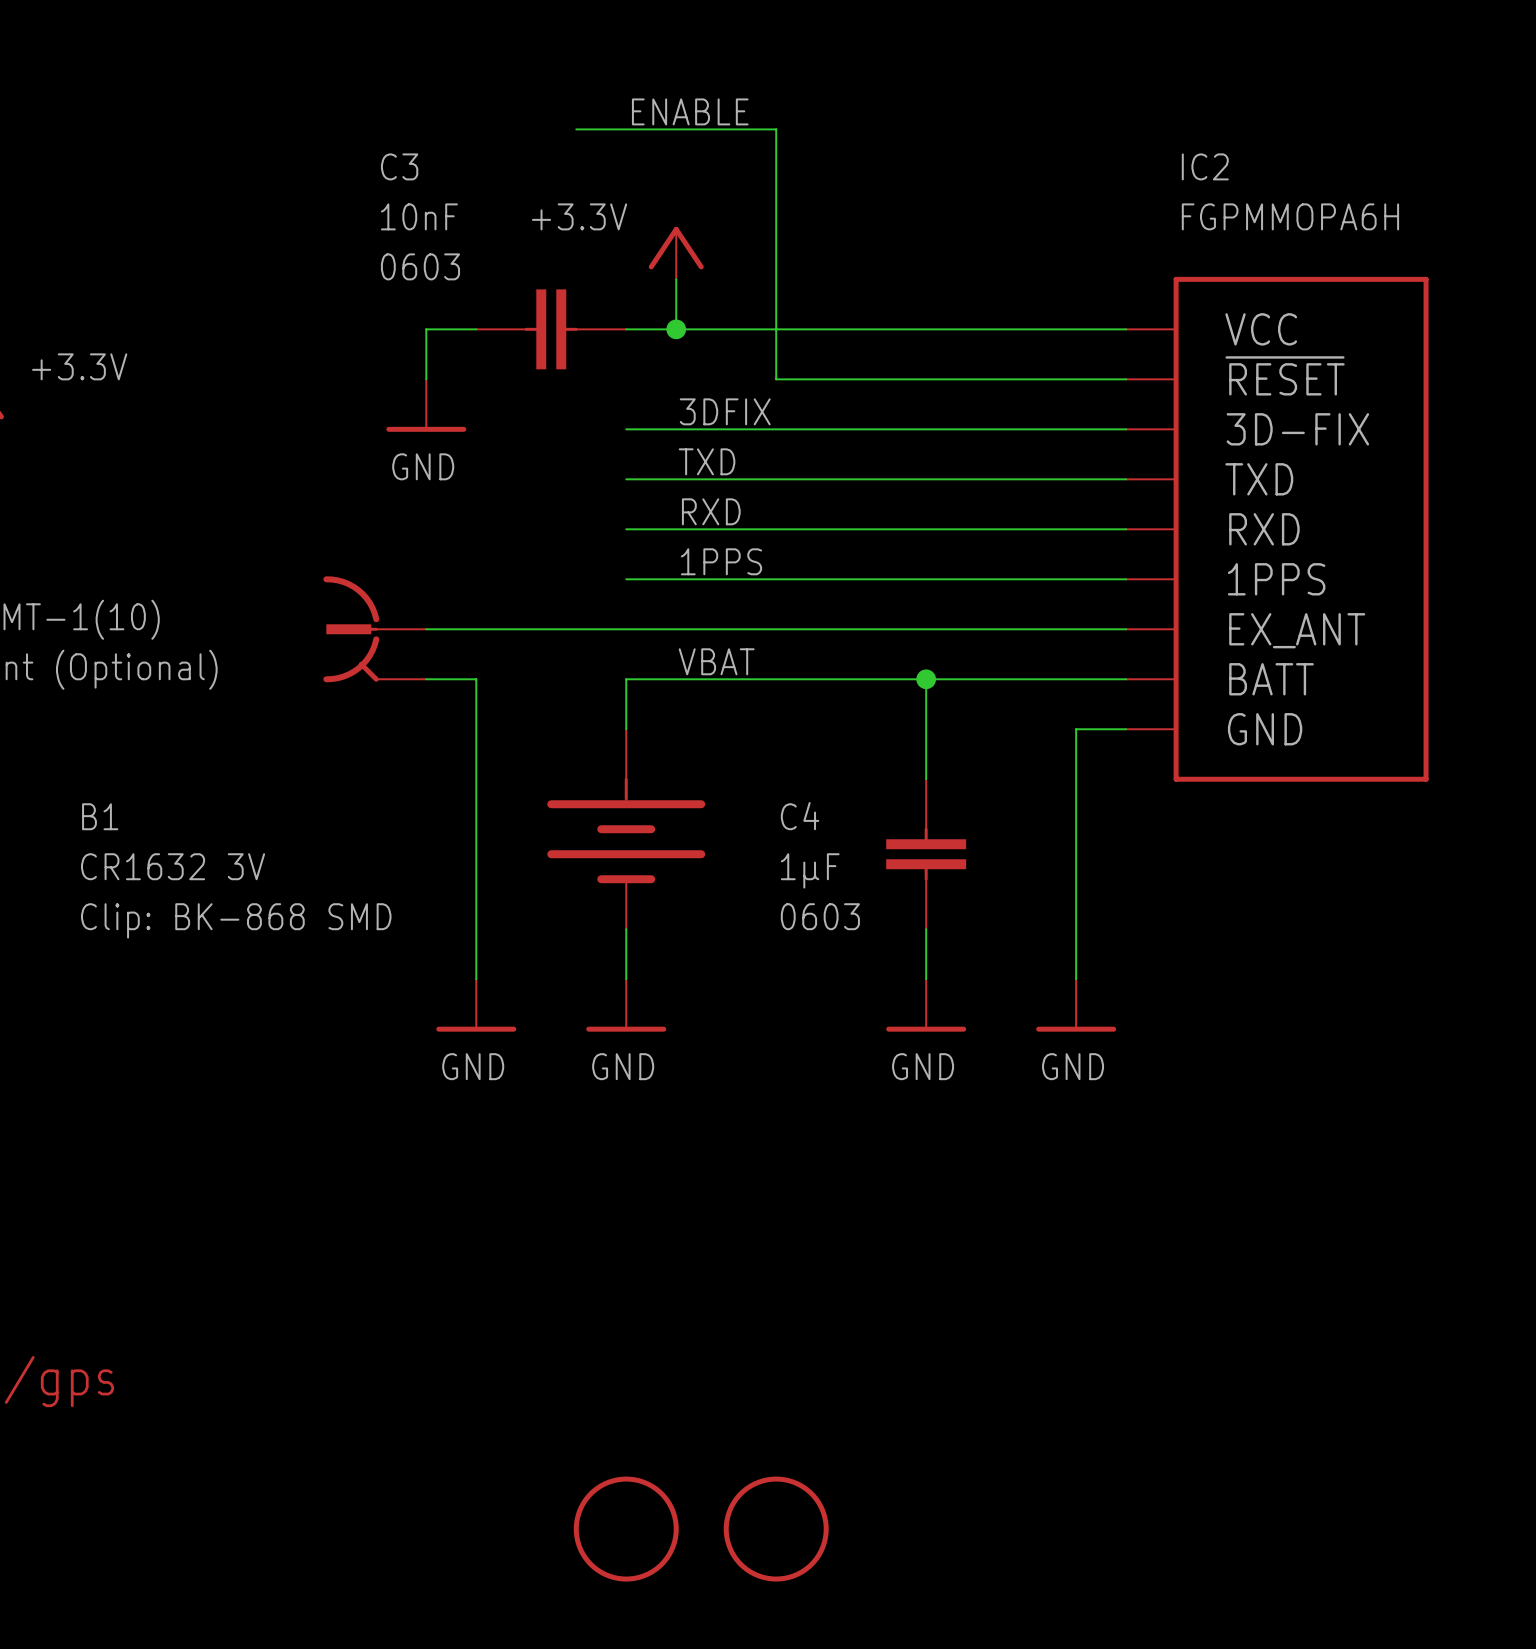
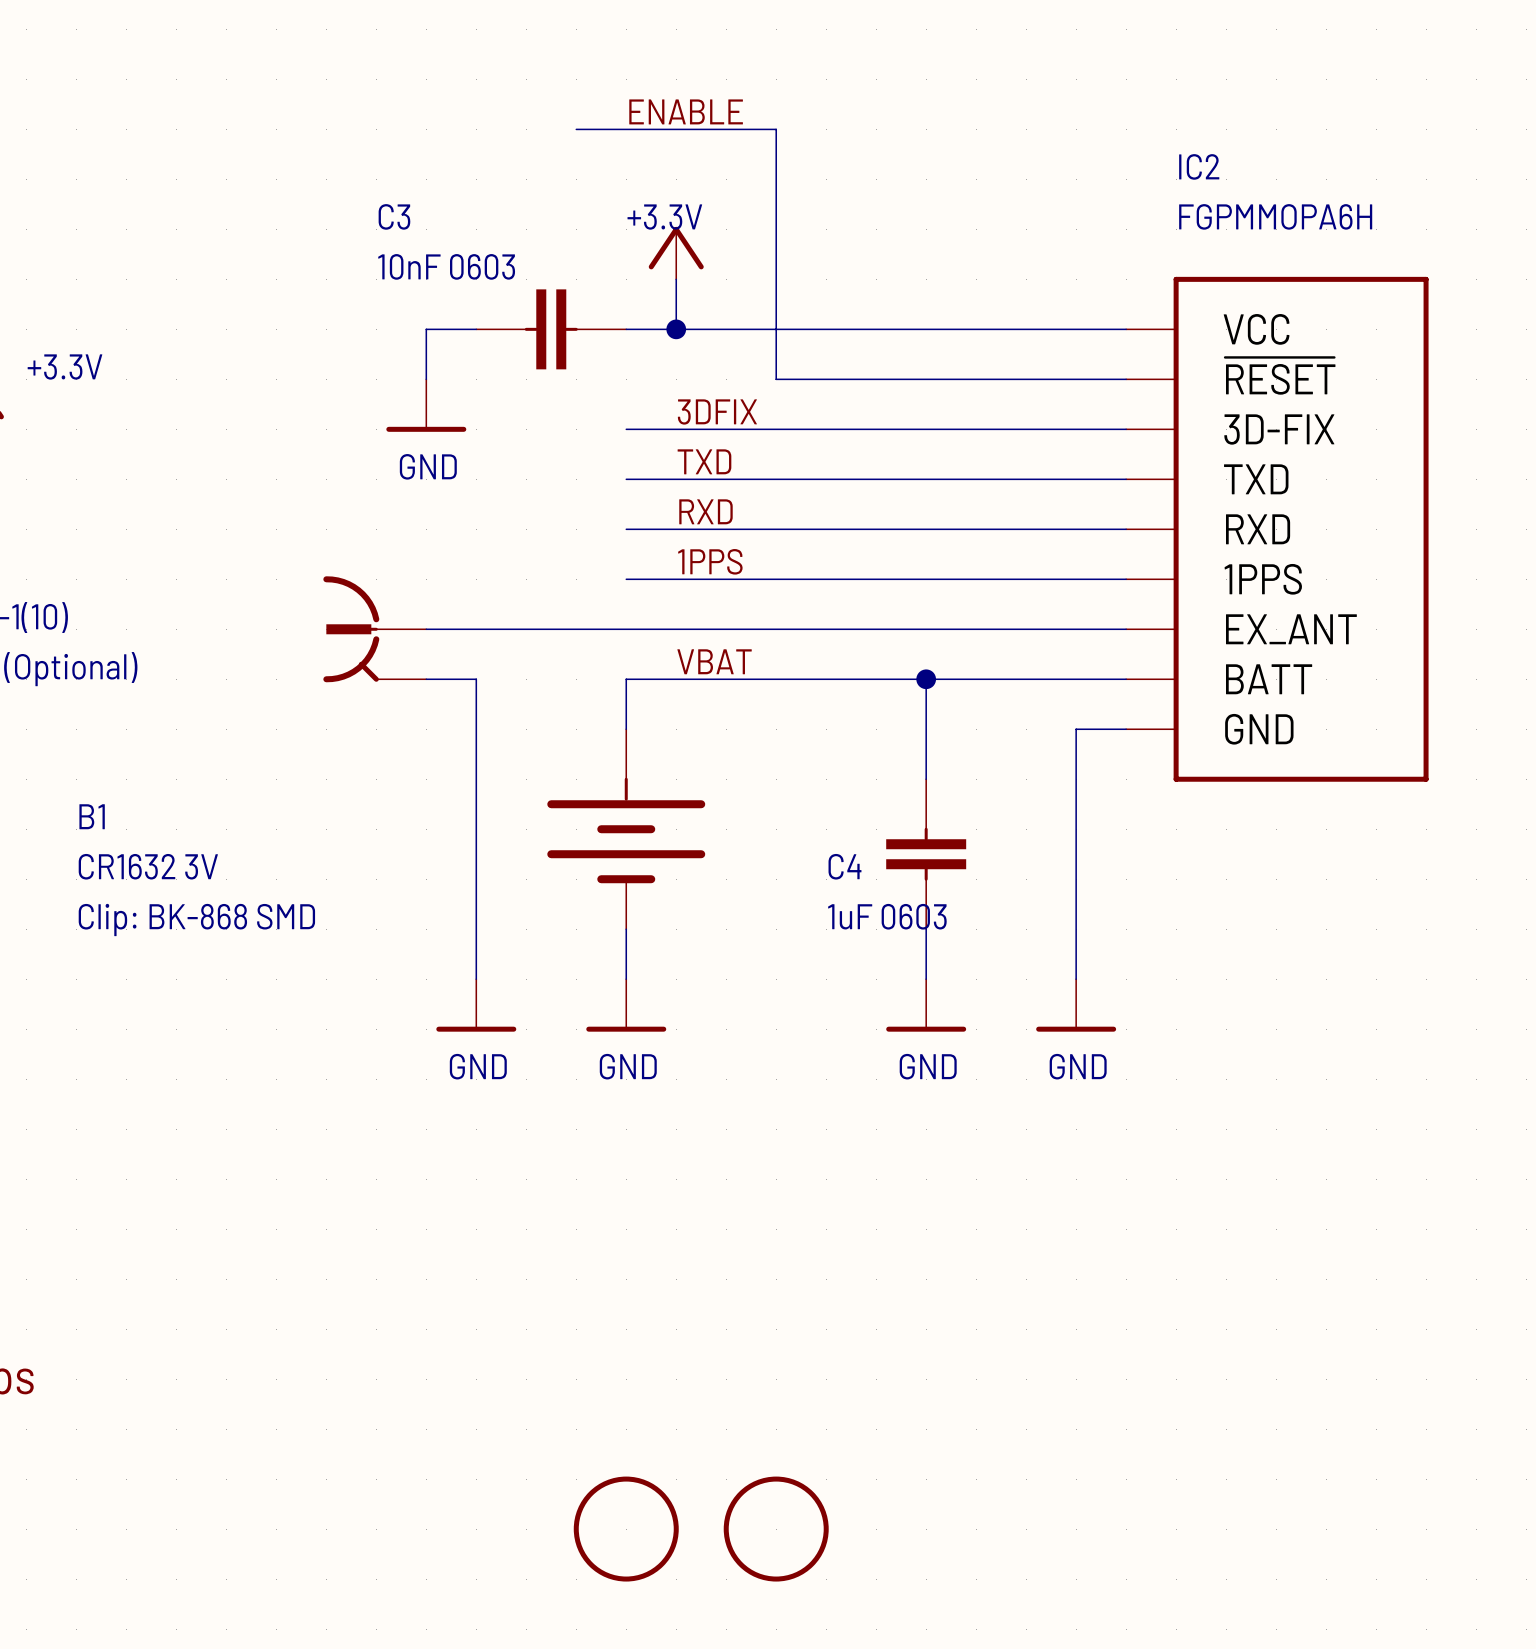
C3 name position: C3 (399, 166) -> C3 (394, 216)
C3 value: 10nF (419, 216) -> 10nF 0603 (446, 266)
power symbol text position: +3.3V (579, 216) -> +3.3V (664, 217)
C3 text: 0603 (420, 266) -> none
C4 name position: C4 (800, 816) -> C4 (844, 866)
C4 value: 1µF (810, 870) -> 1uF 0603 (887, 916)
C4 text: 0603 (820, 916) -> none

